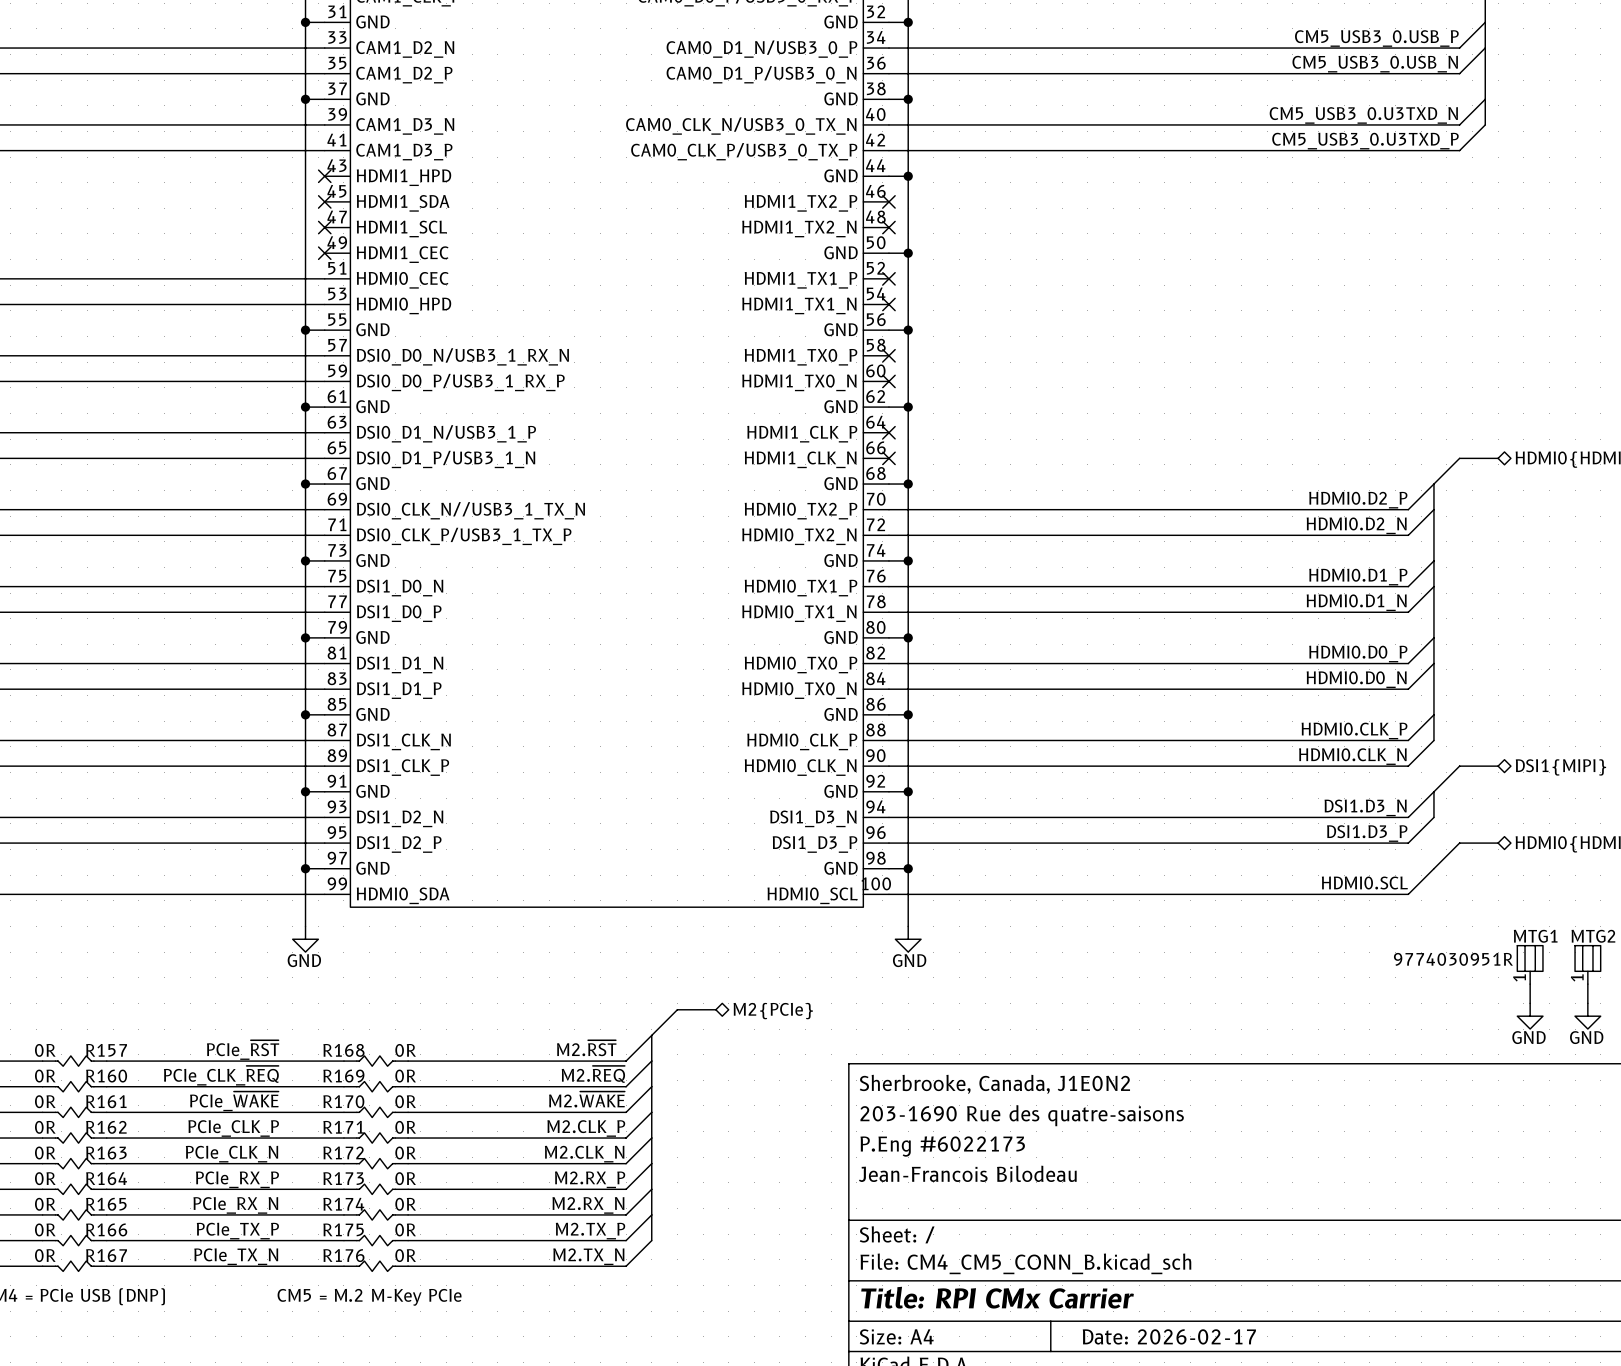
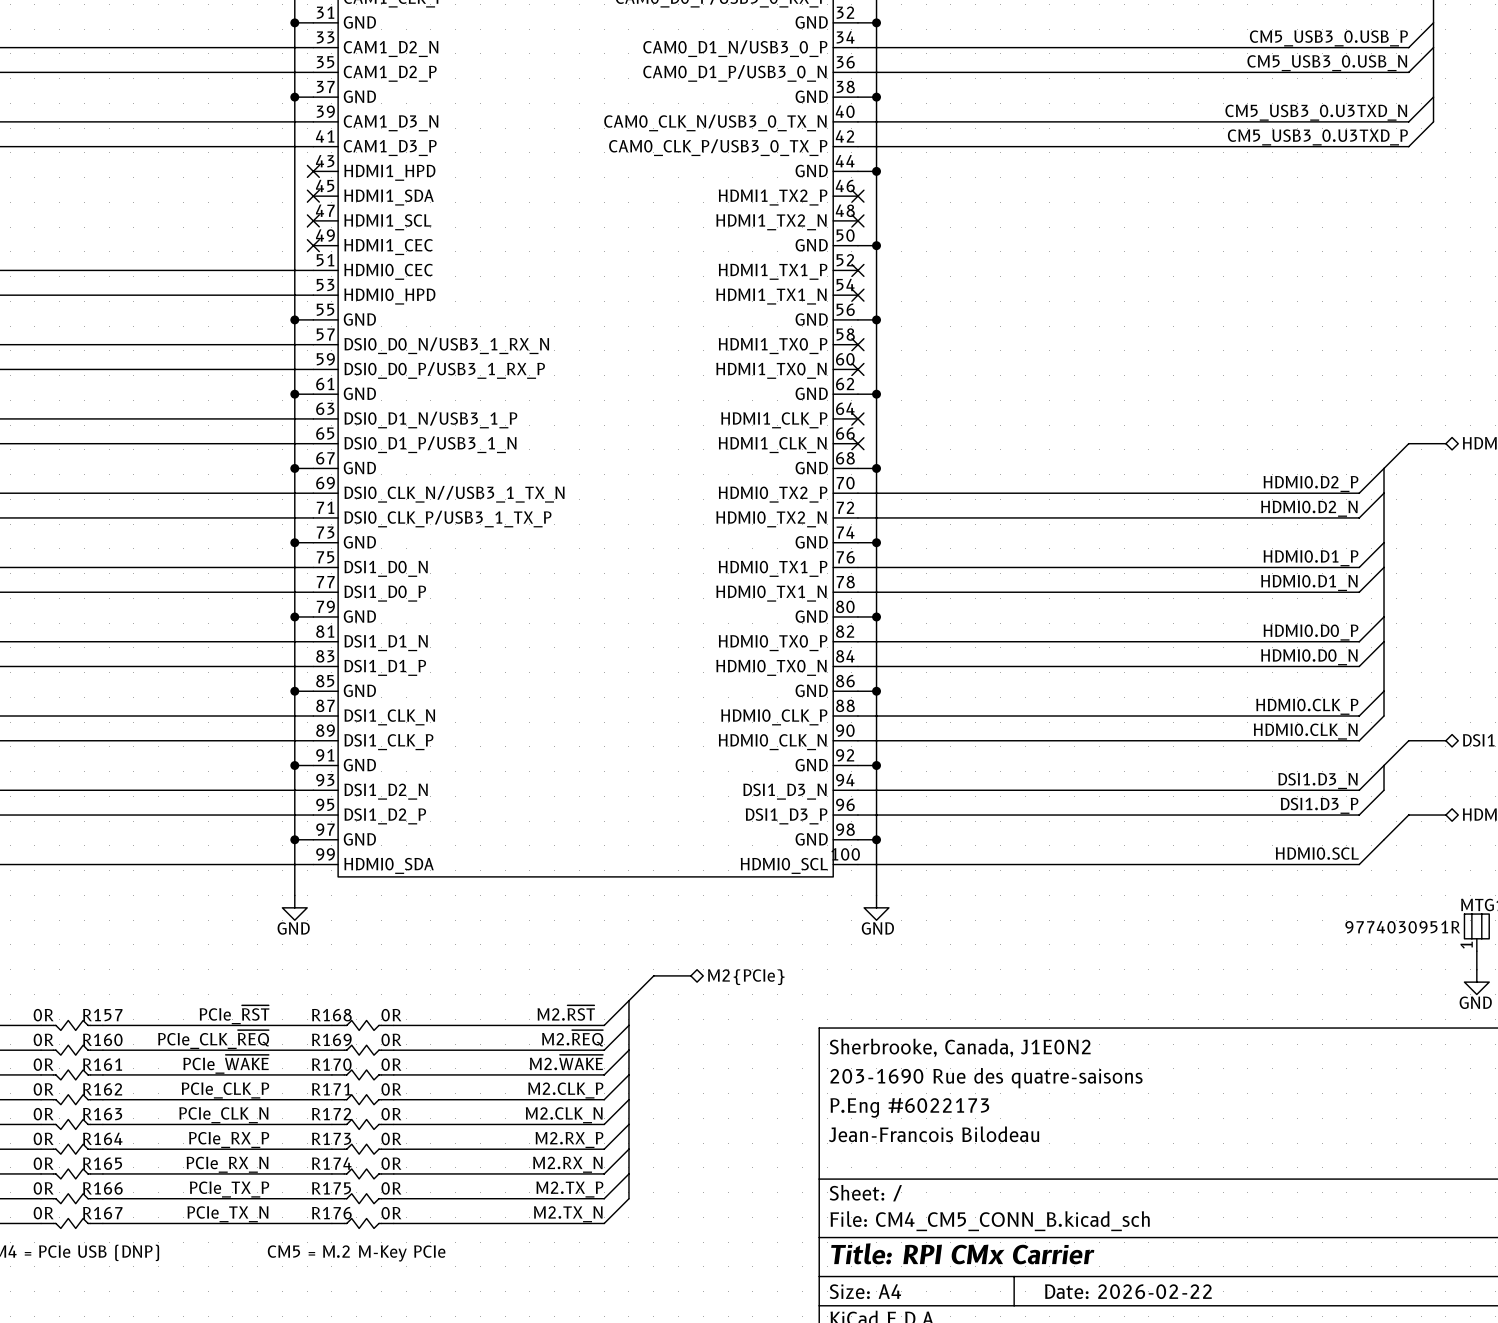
title block: Date: 2026-02-17 (1169, 1336) -> Date: 2026-02-22 (1128, 1291)

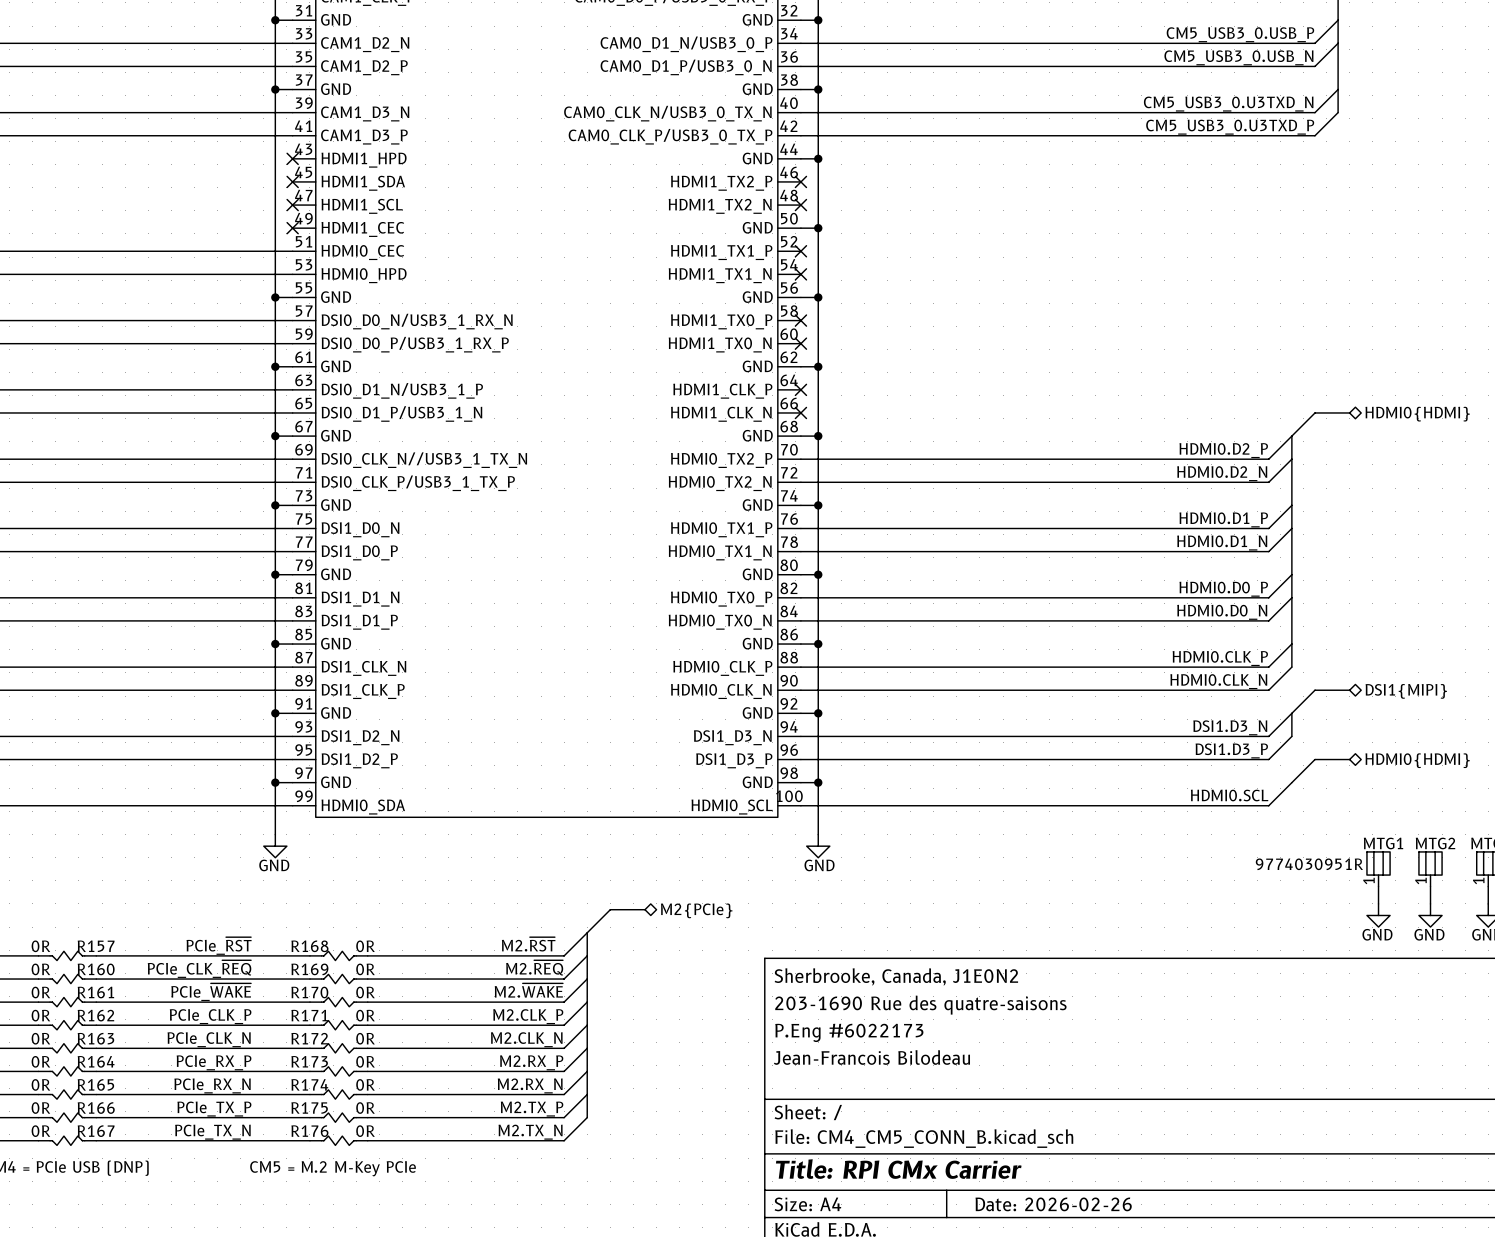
title block: Date: 2026-02-22 (1128, 1291) -> Date: 2026-02-26 (1053, 1204)

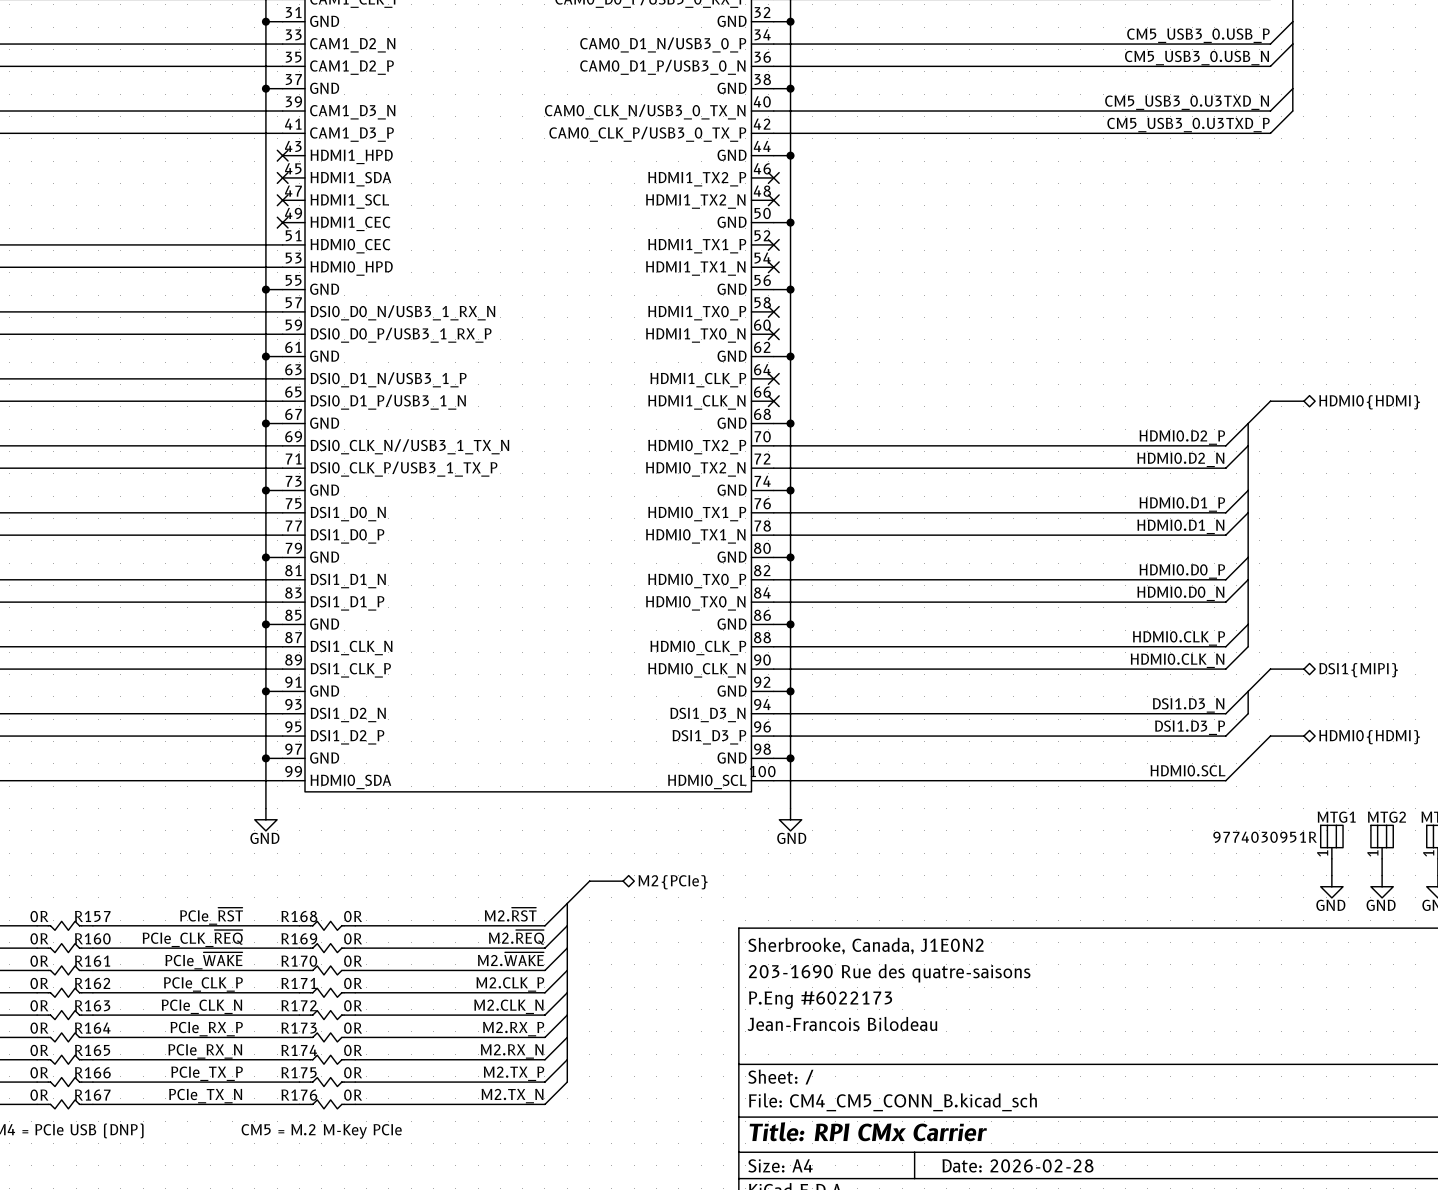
title block: Date: 2026-02-26 (1053, 1204) -> Date: 2026-02-28 (1017, 1165)

